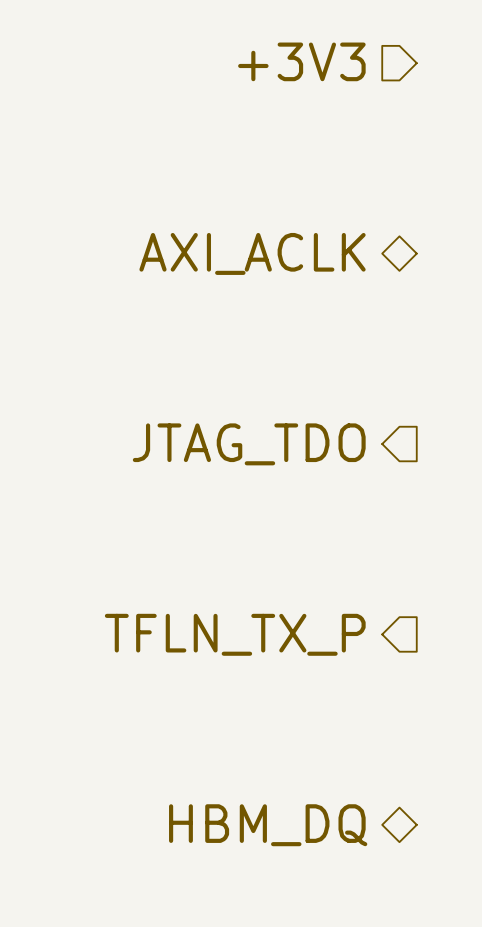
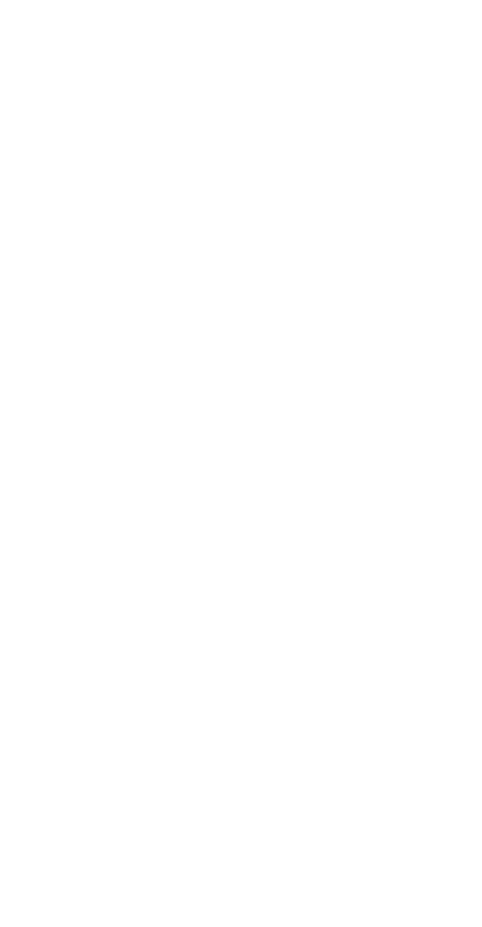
hierarchical label: +3V3 (301, 61) -> none
hierarchical label: AXI_ACLK (252, 253) -> none
hierarchical label: JTAG_TDO (249, 444) -> none
hierarchical label: TFLN_TX_P (235, 634) -> none
hierarchical label: HBM_DQ (268, 825) -> none

